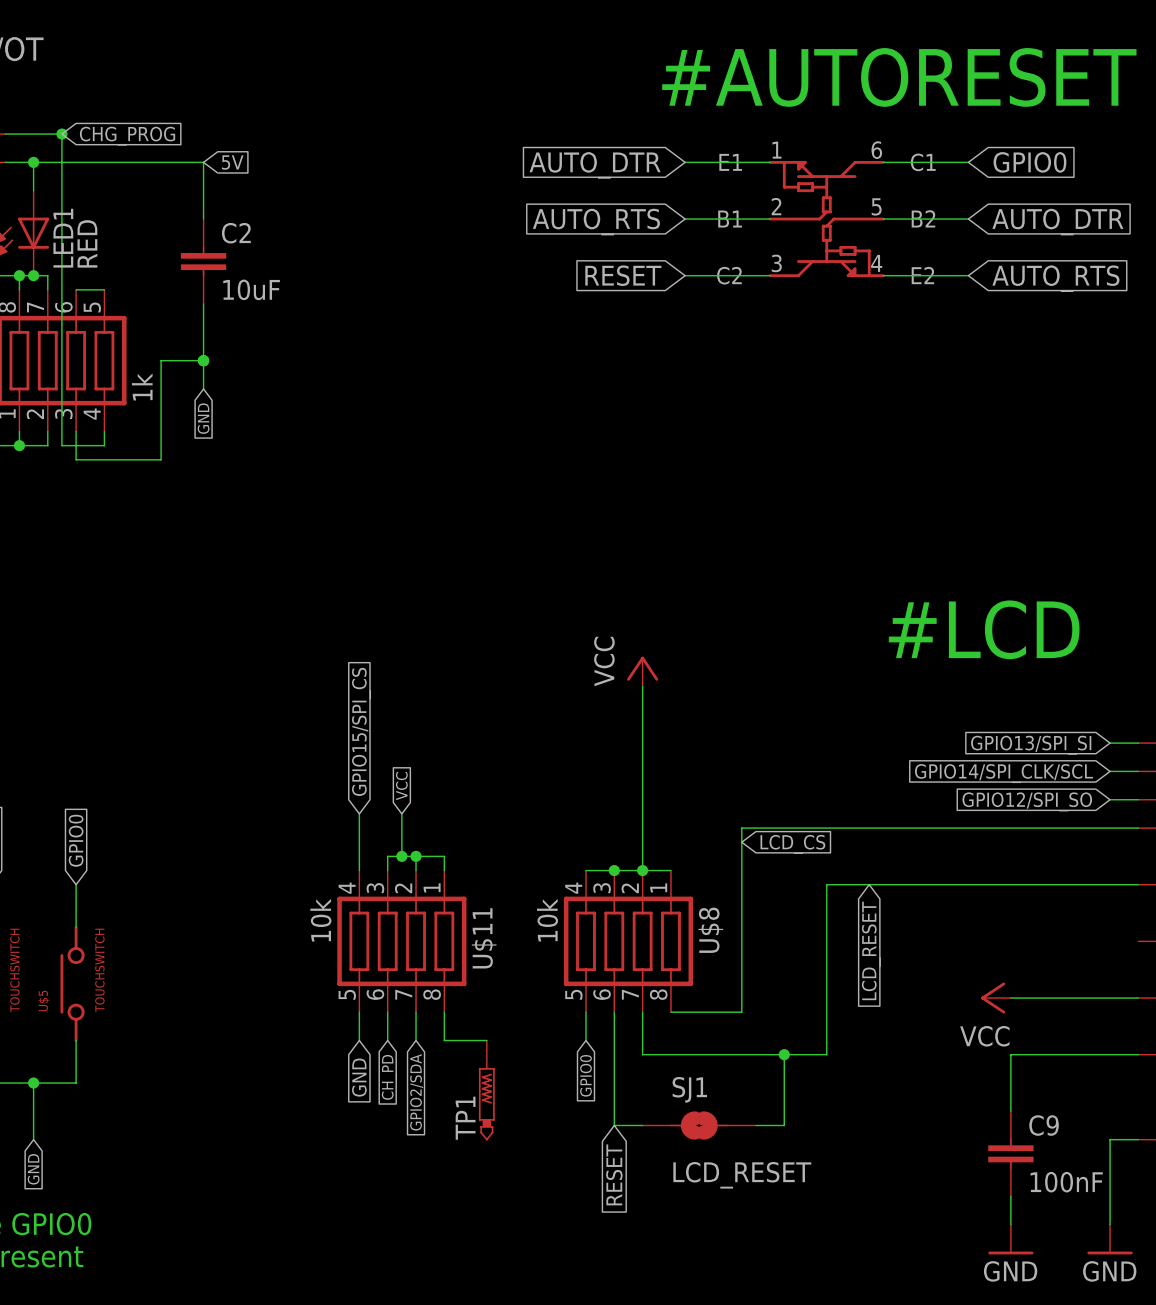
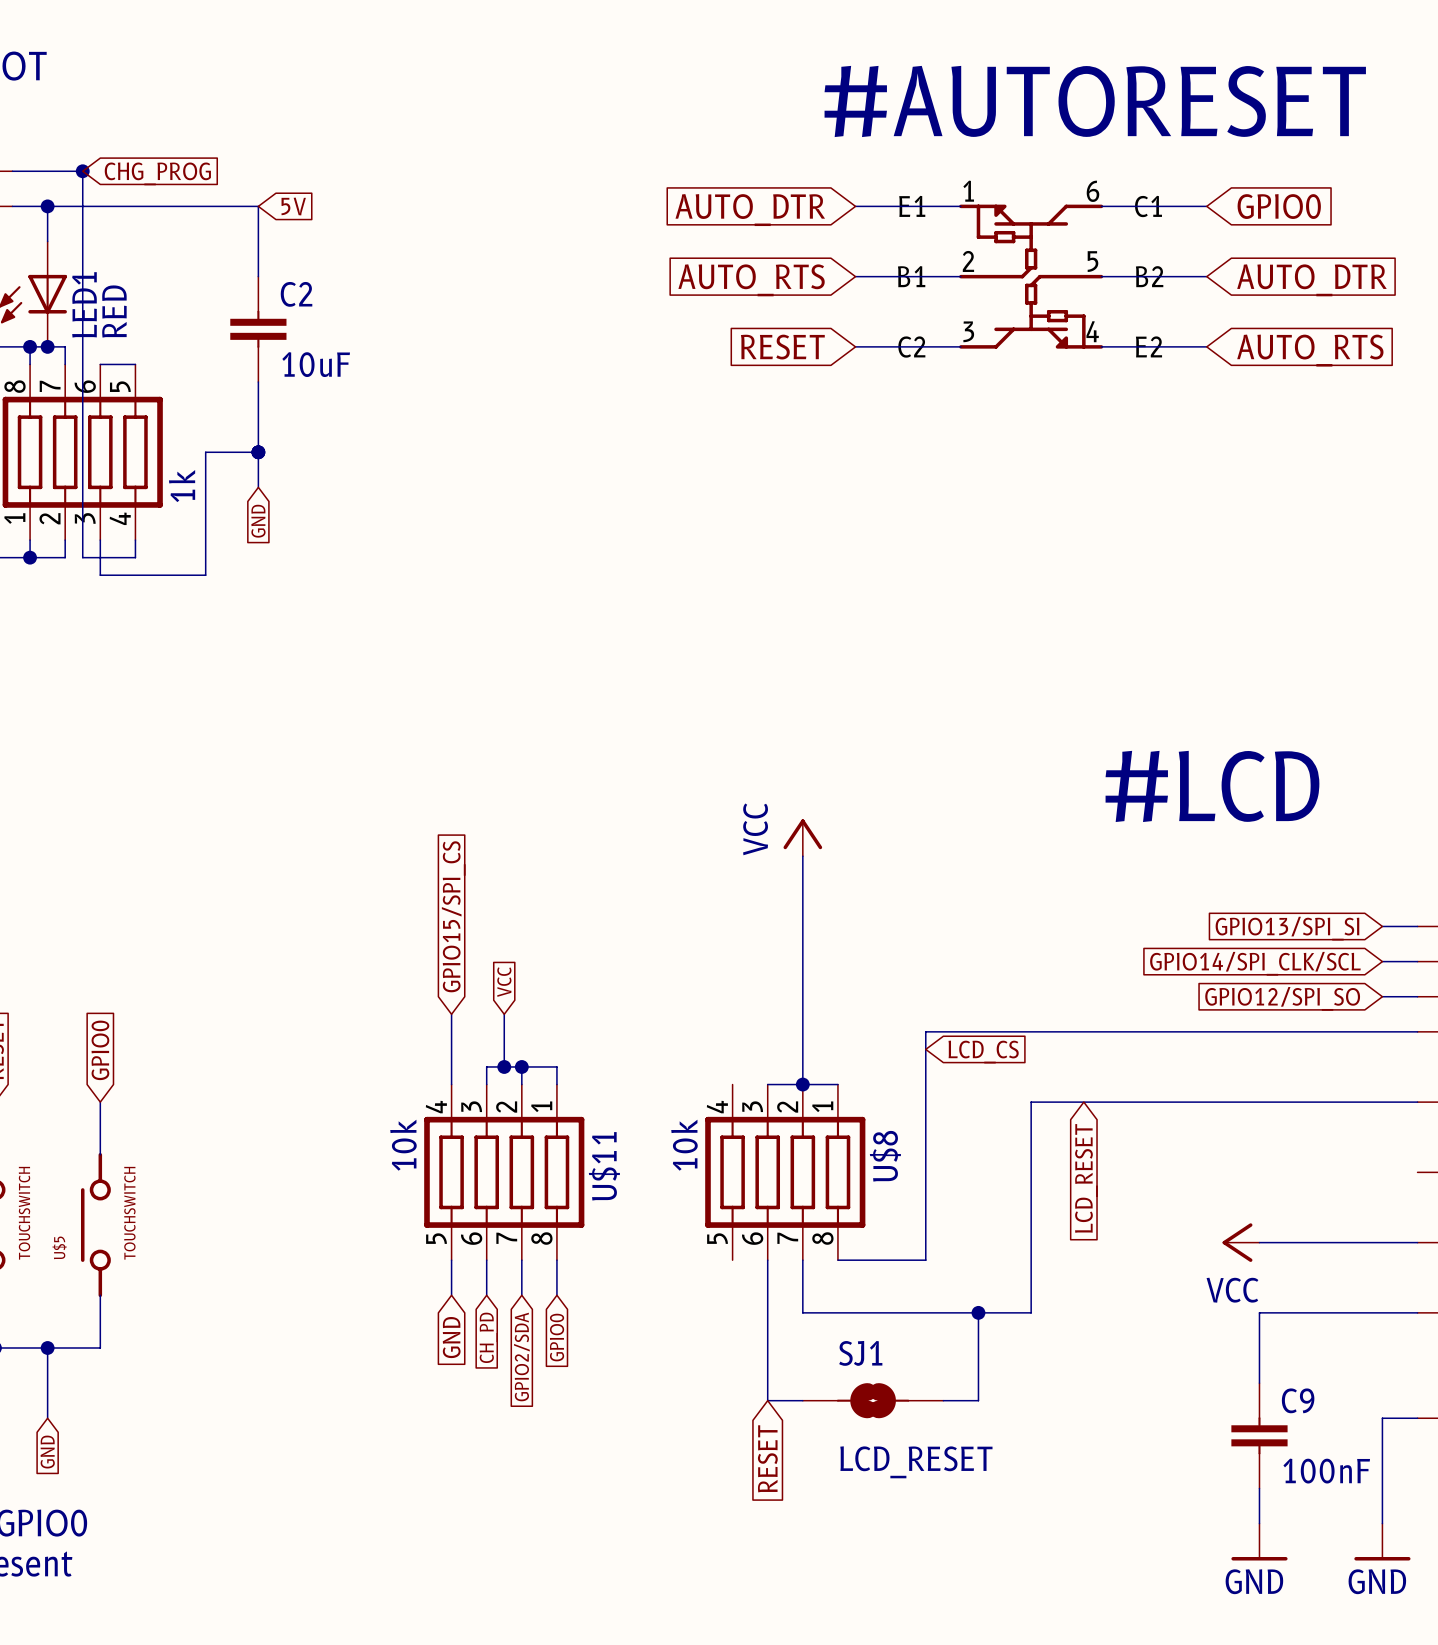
wire: (585, 870) (614, 870) -> none
junction: (614, 870) -> none
wire: (585, 1012) (585, 1040) -> none
wire: (444, 1040) (486, 1040) -> none
global label position: GPIO0 (585, 1075) -> GPIO0 (557, 1337)
TP1: (486, 1090) -> none

